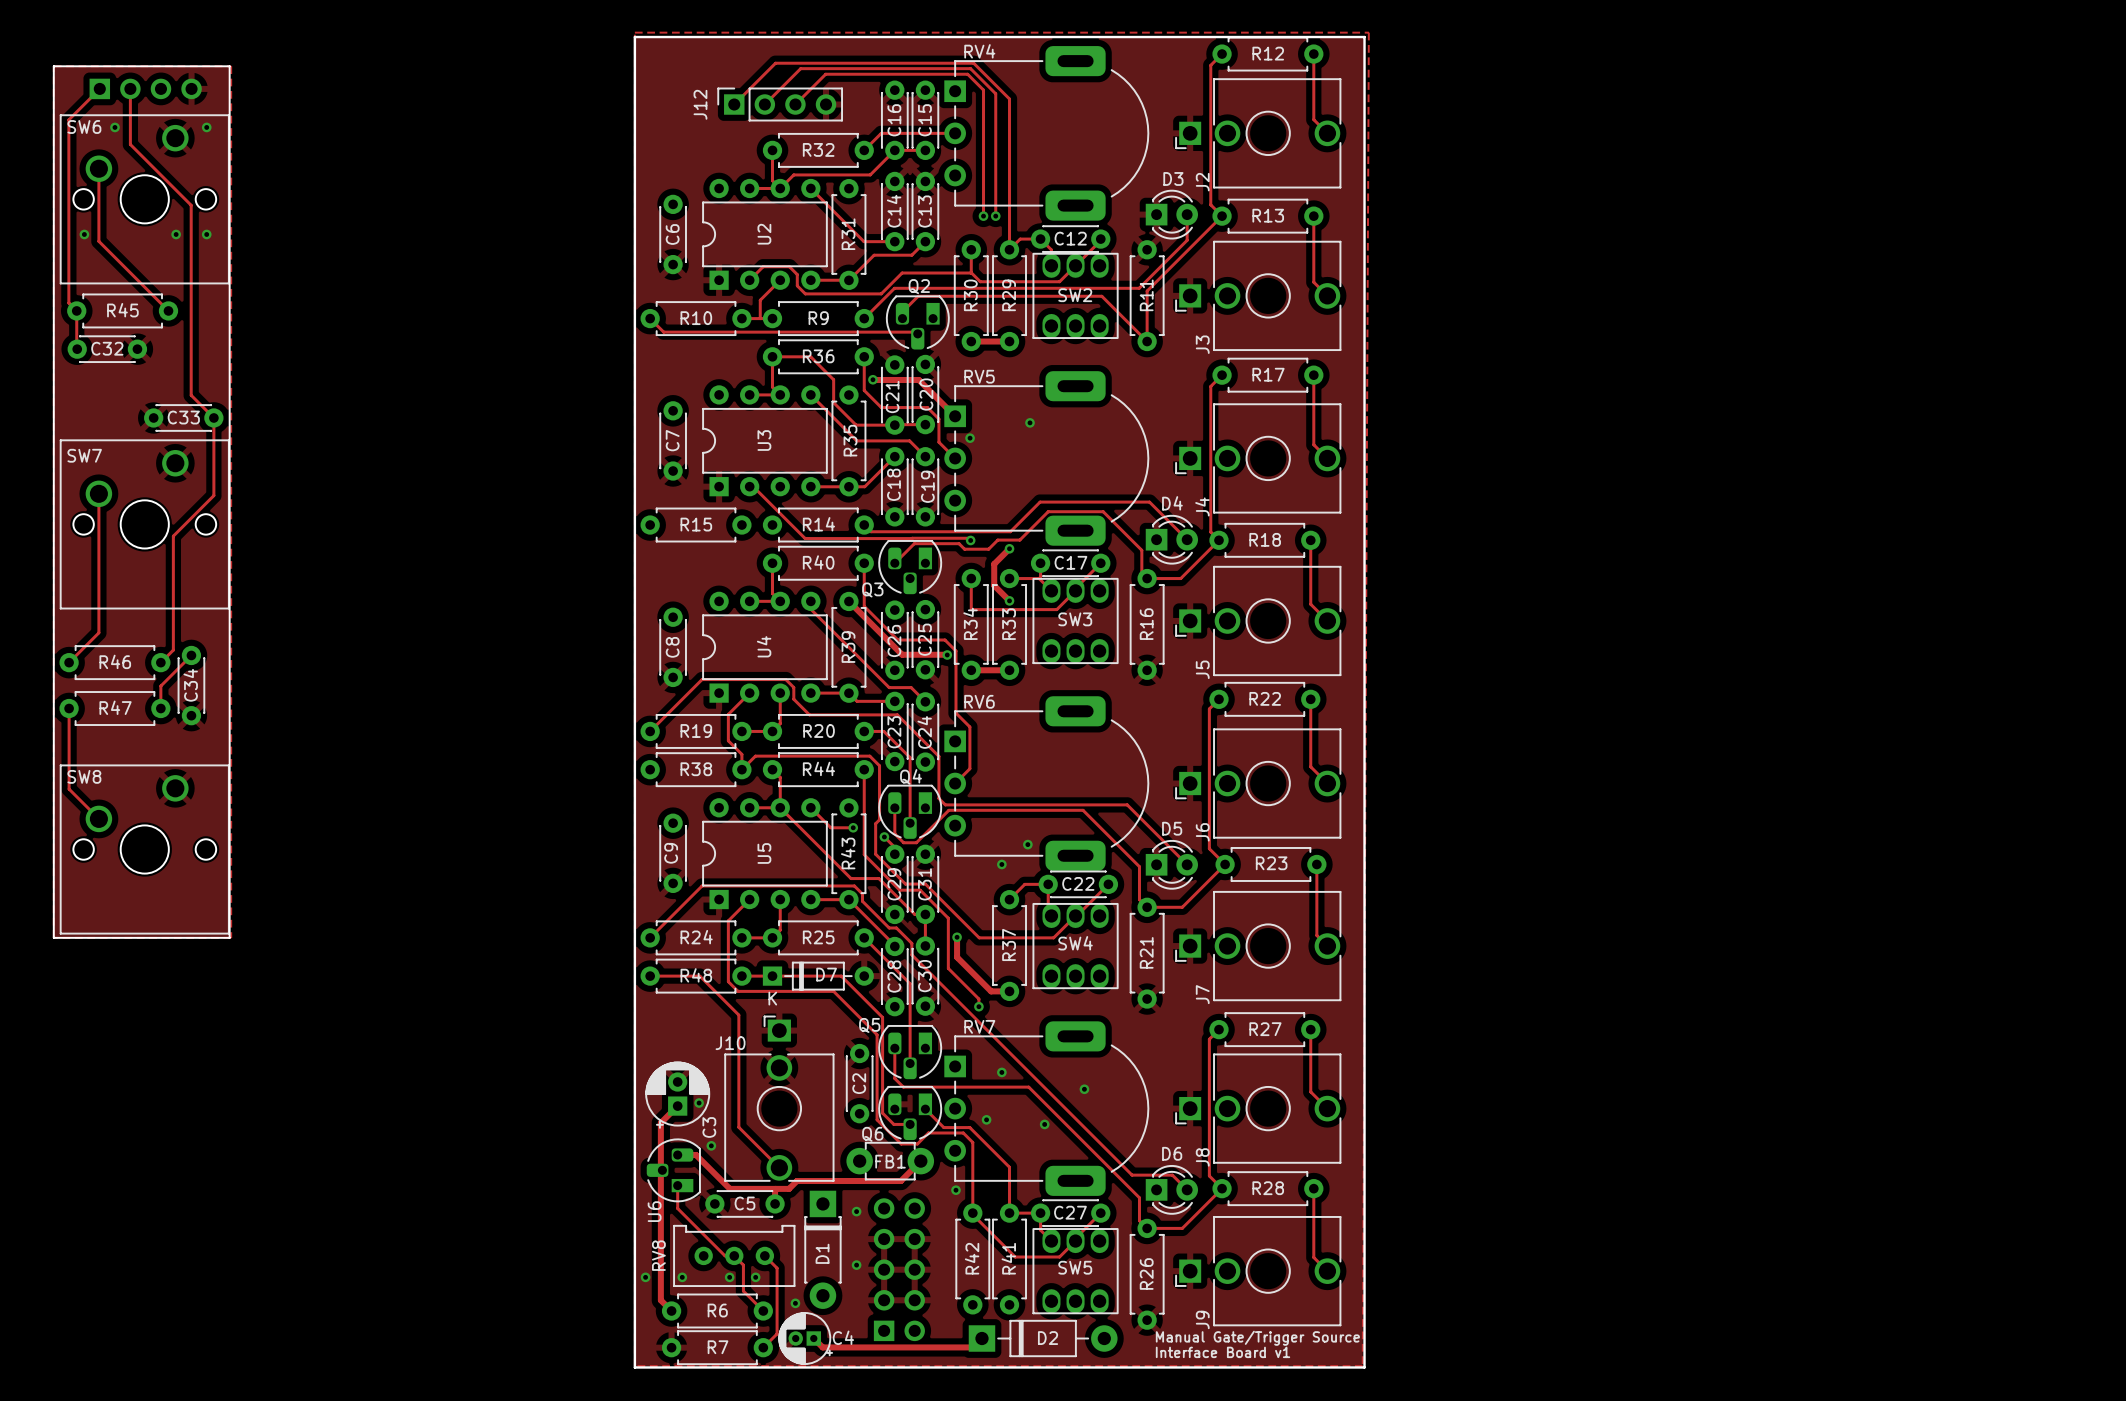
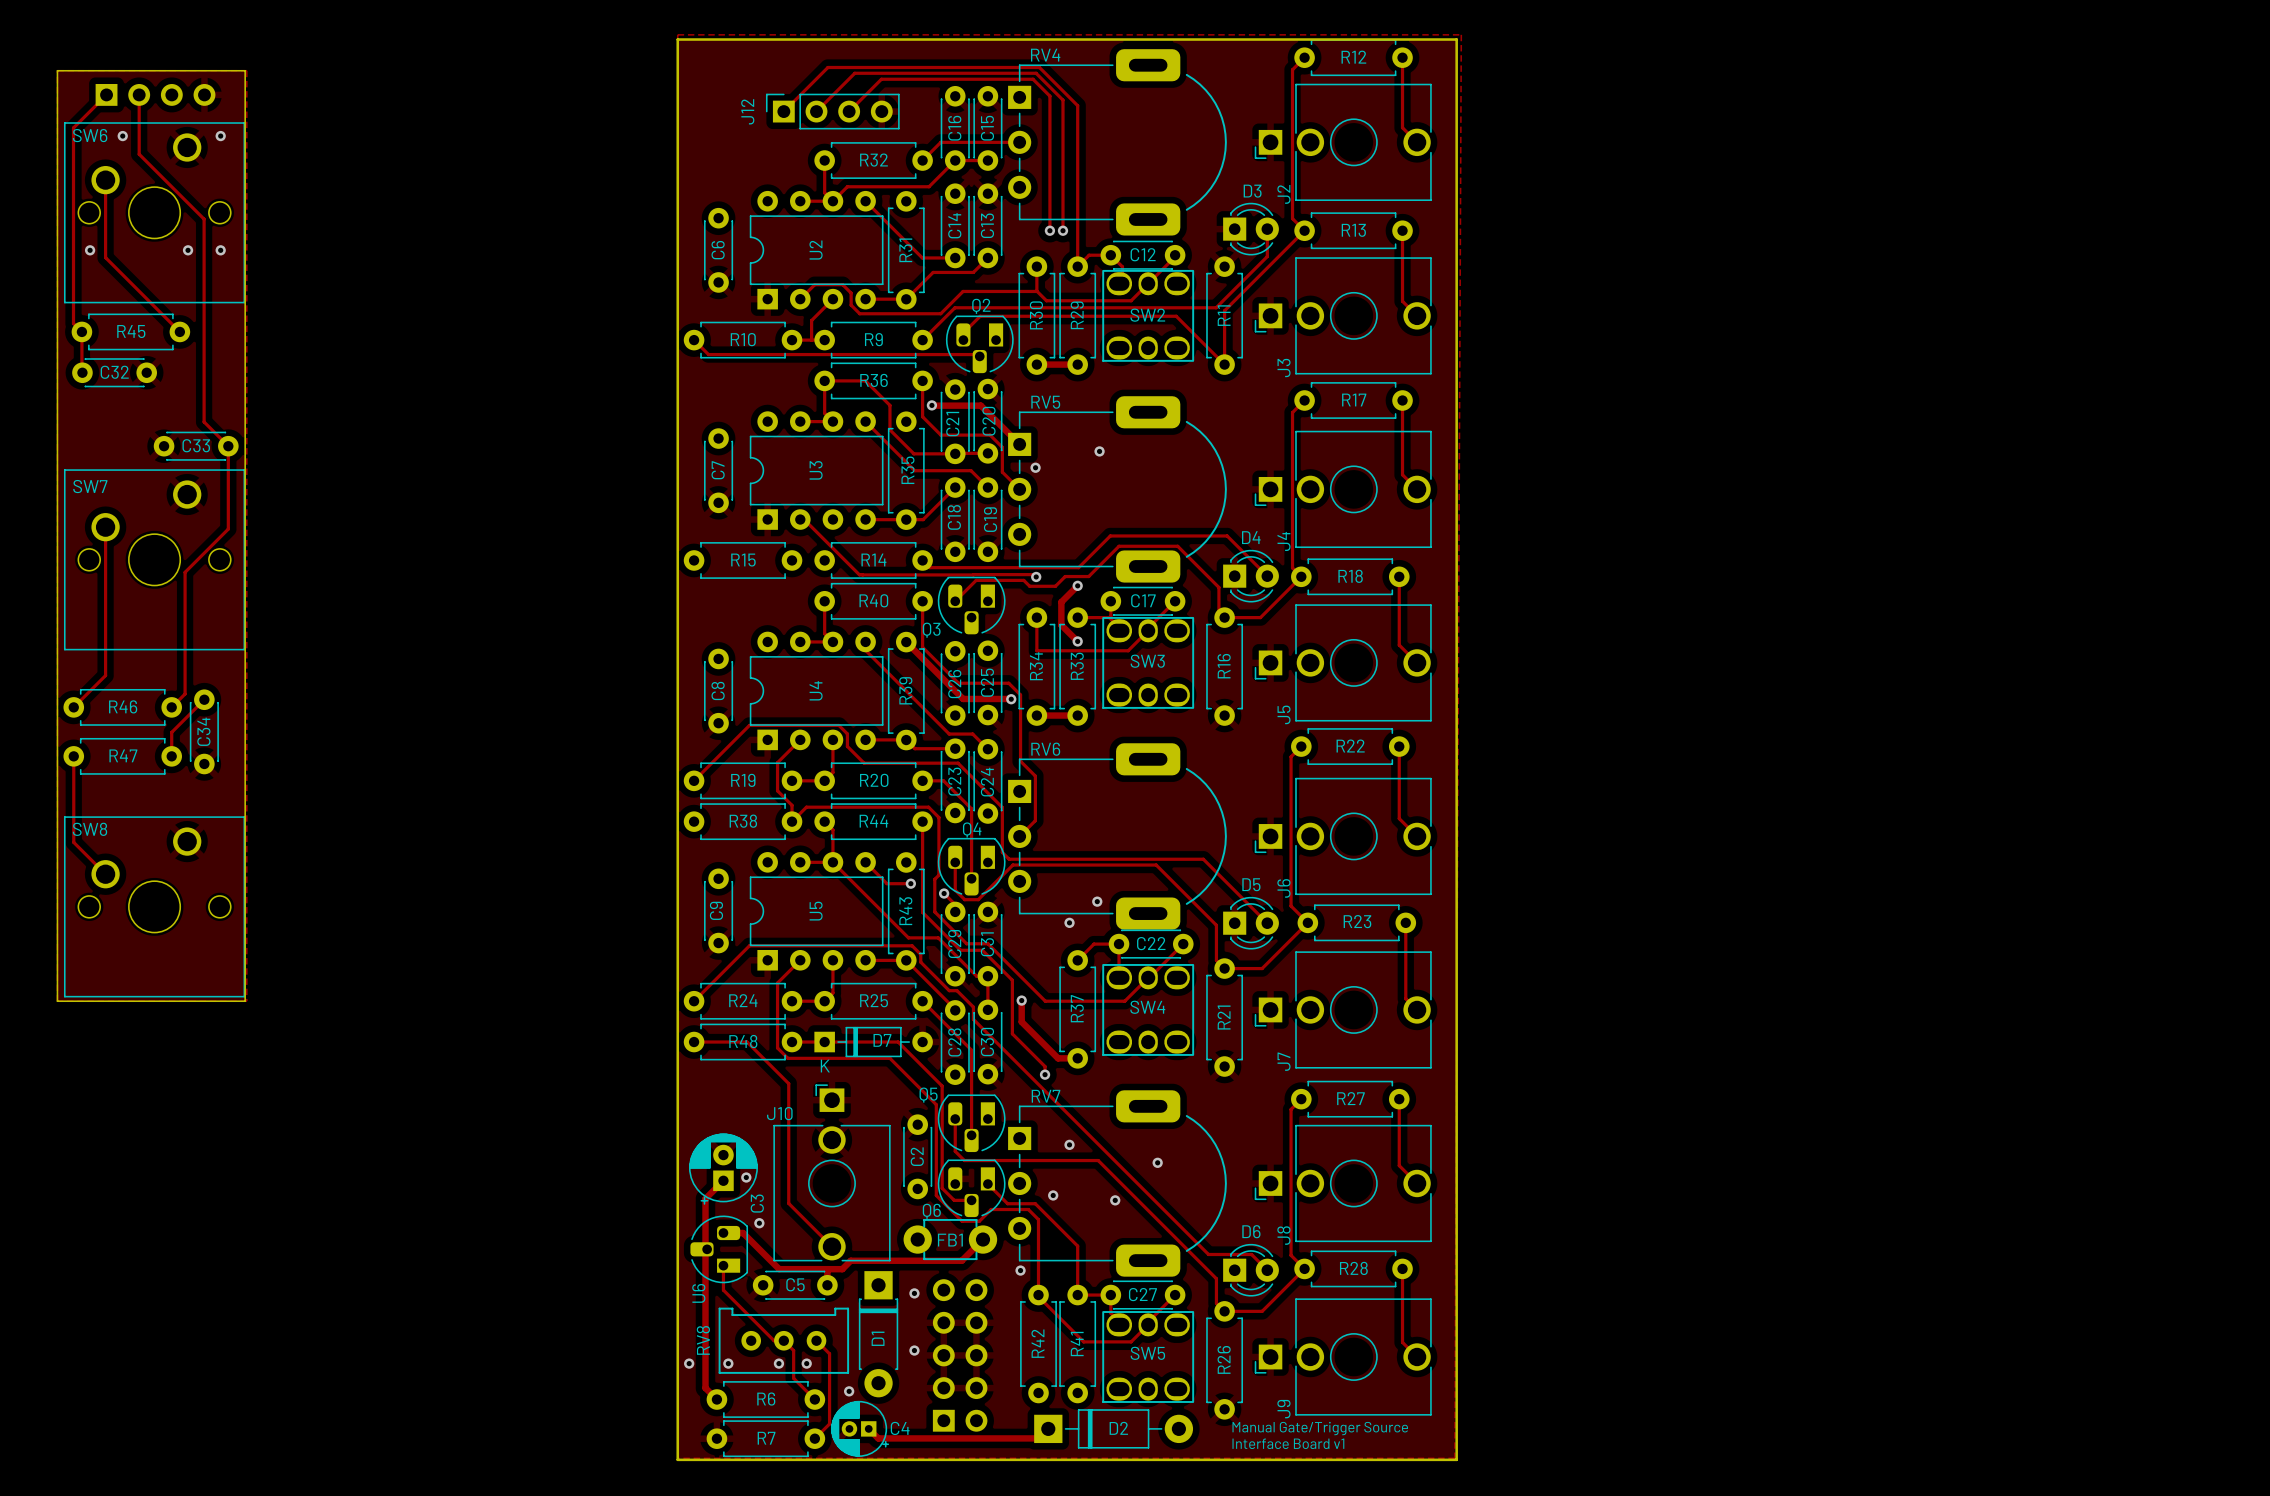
SW2 footprint: [1032, 252, 1119, 339] -> [1102, 269, 1195, 362]
SW3 footprint: [1032, 577, 1119, 665] -> [1102, 616, 1195, 709]
SW4 footprint: [1032, 903, 1119, 990] -> [1102, 964, 1195, 1056]
SW5 footprint: [1032, 1228, 1119, 1315] -> [1102, 1311, 1195, 1403]

